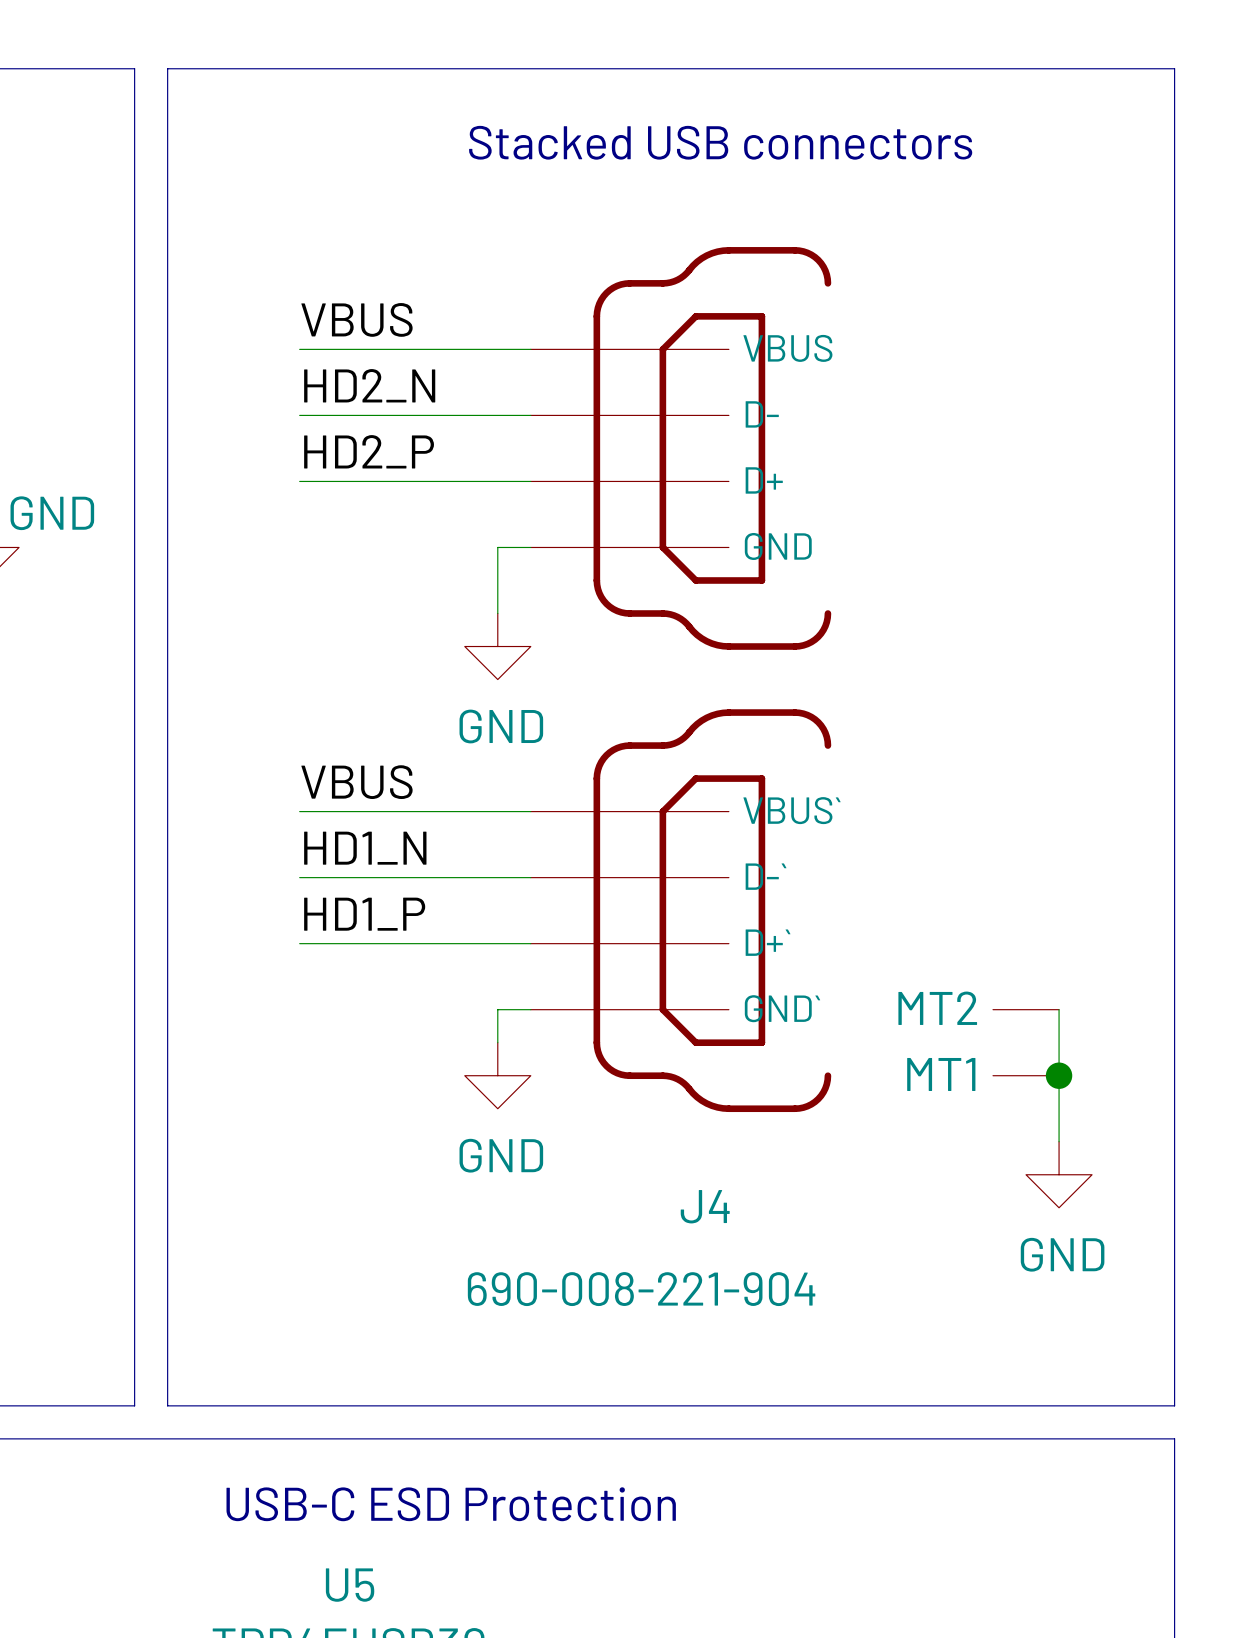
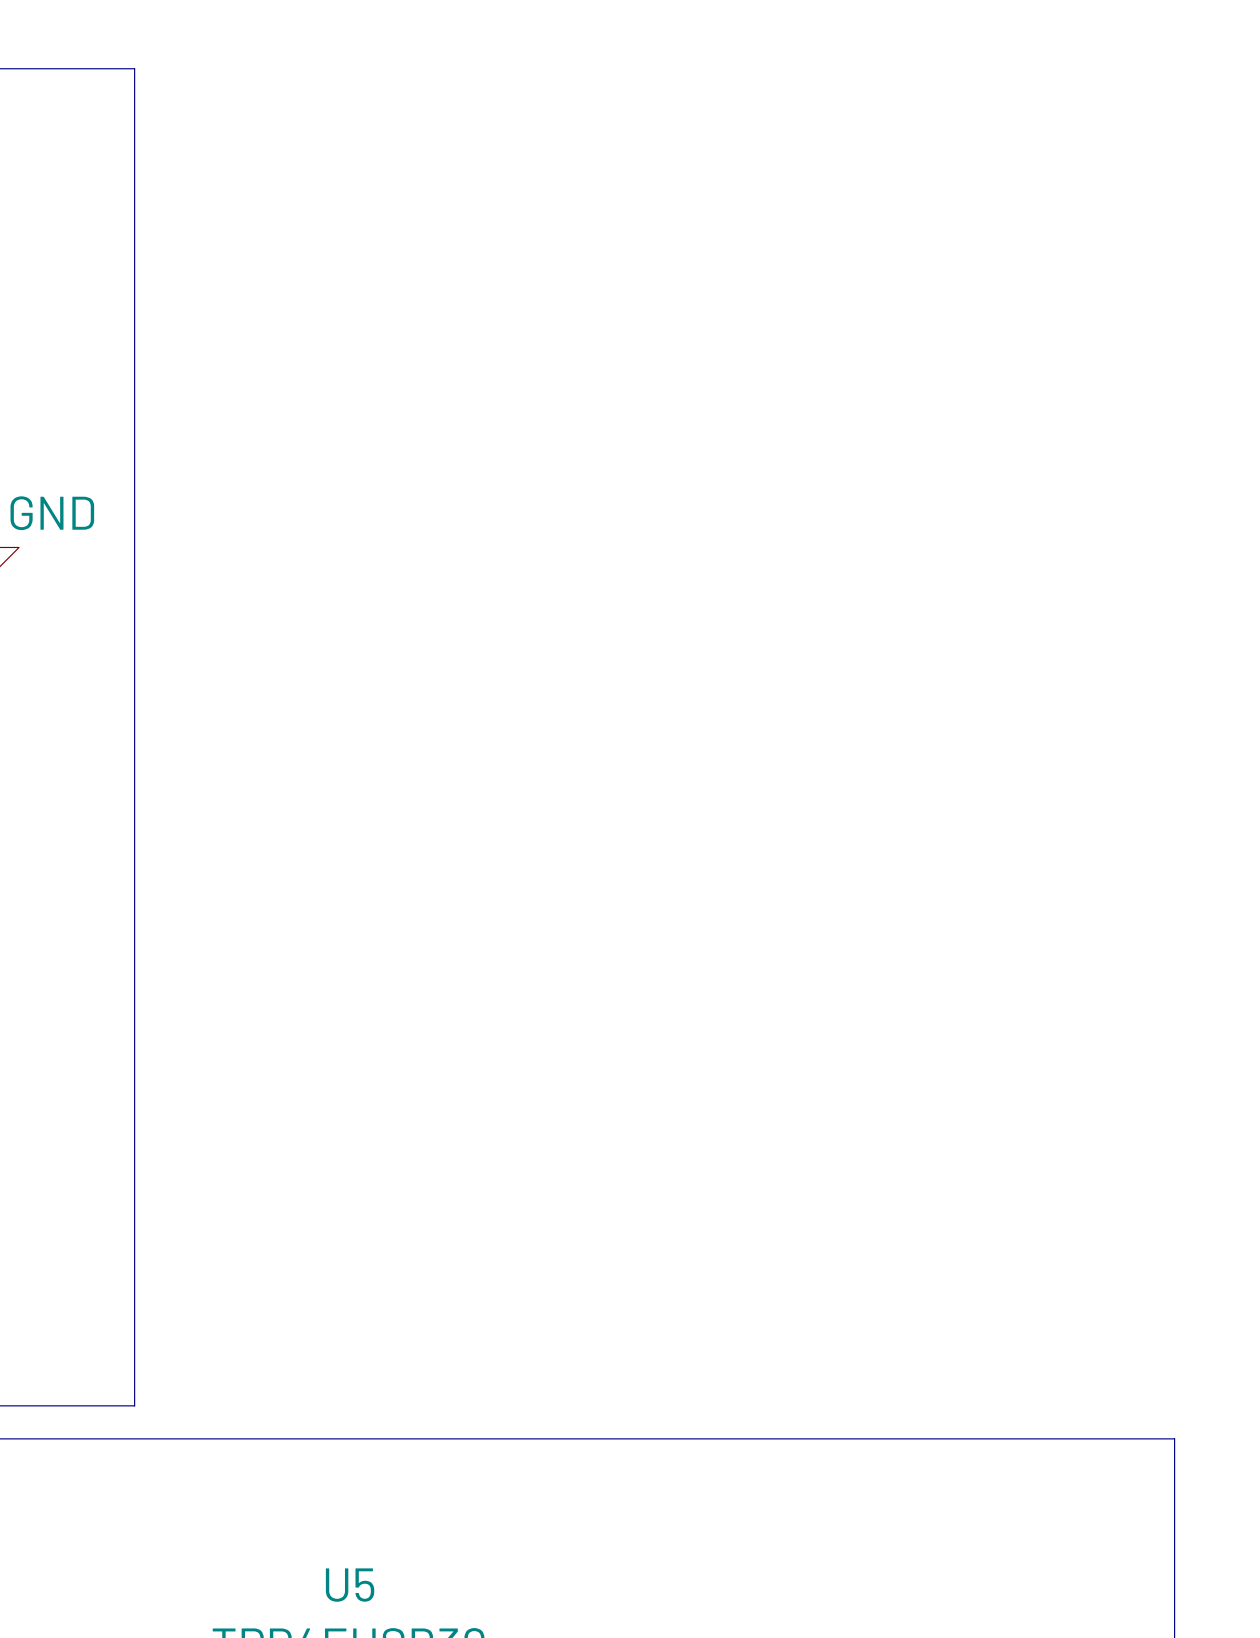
line: (167, 68) (1174, 68) (1174, 1405) (167, 1405) (167, 68) -> none
text: Stacked USB connectors (720, 142) -> none
label: VBUS (356, 319) -> none
wire: (299, 349) (530, 349) -> none
label: HD2_N (369, 385) -> none
wire: (299, 415) (530, 415) -> none
label: HD2_P (369, 451) -> none
wire: (299, 481) (530, 481) -> none
wire: (530, 547) (497, 547) (497, 613) -> none
power symbol: GND (497, 646) -> none
J4: 690-008-221-904 (794, 679) -> none
label: VBUS (356, 782) -> none
wire: (299, 811) (530, 811) -> none
label: HD1_N (365, 848) -> none
wire: (299, 877) (530, 877) -> none
label: HD1_P (364, 914) -> none
wire: (299, 943) (530, 943) -> none
wire: (530, 1009) (497, 1009) (497, 1042) -> none
wire: (1059, 1009) (1059, 1141) -> none
power symbol: GND (497, 1075) -> none
junction: (1059, 1075) -> none
power symbol: GND (1059, 1174) -> none
text: USB-C ESD Protection (451, 1504) -> none

